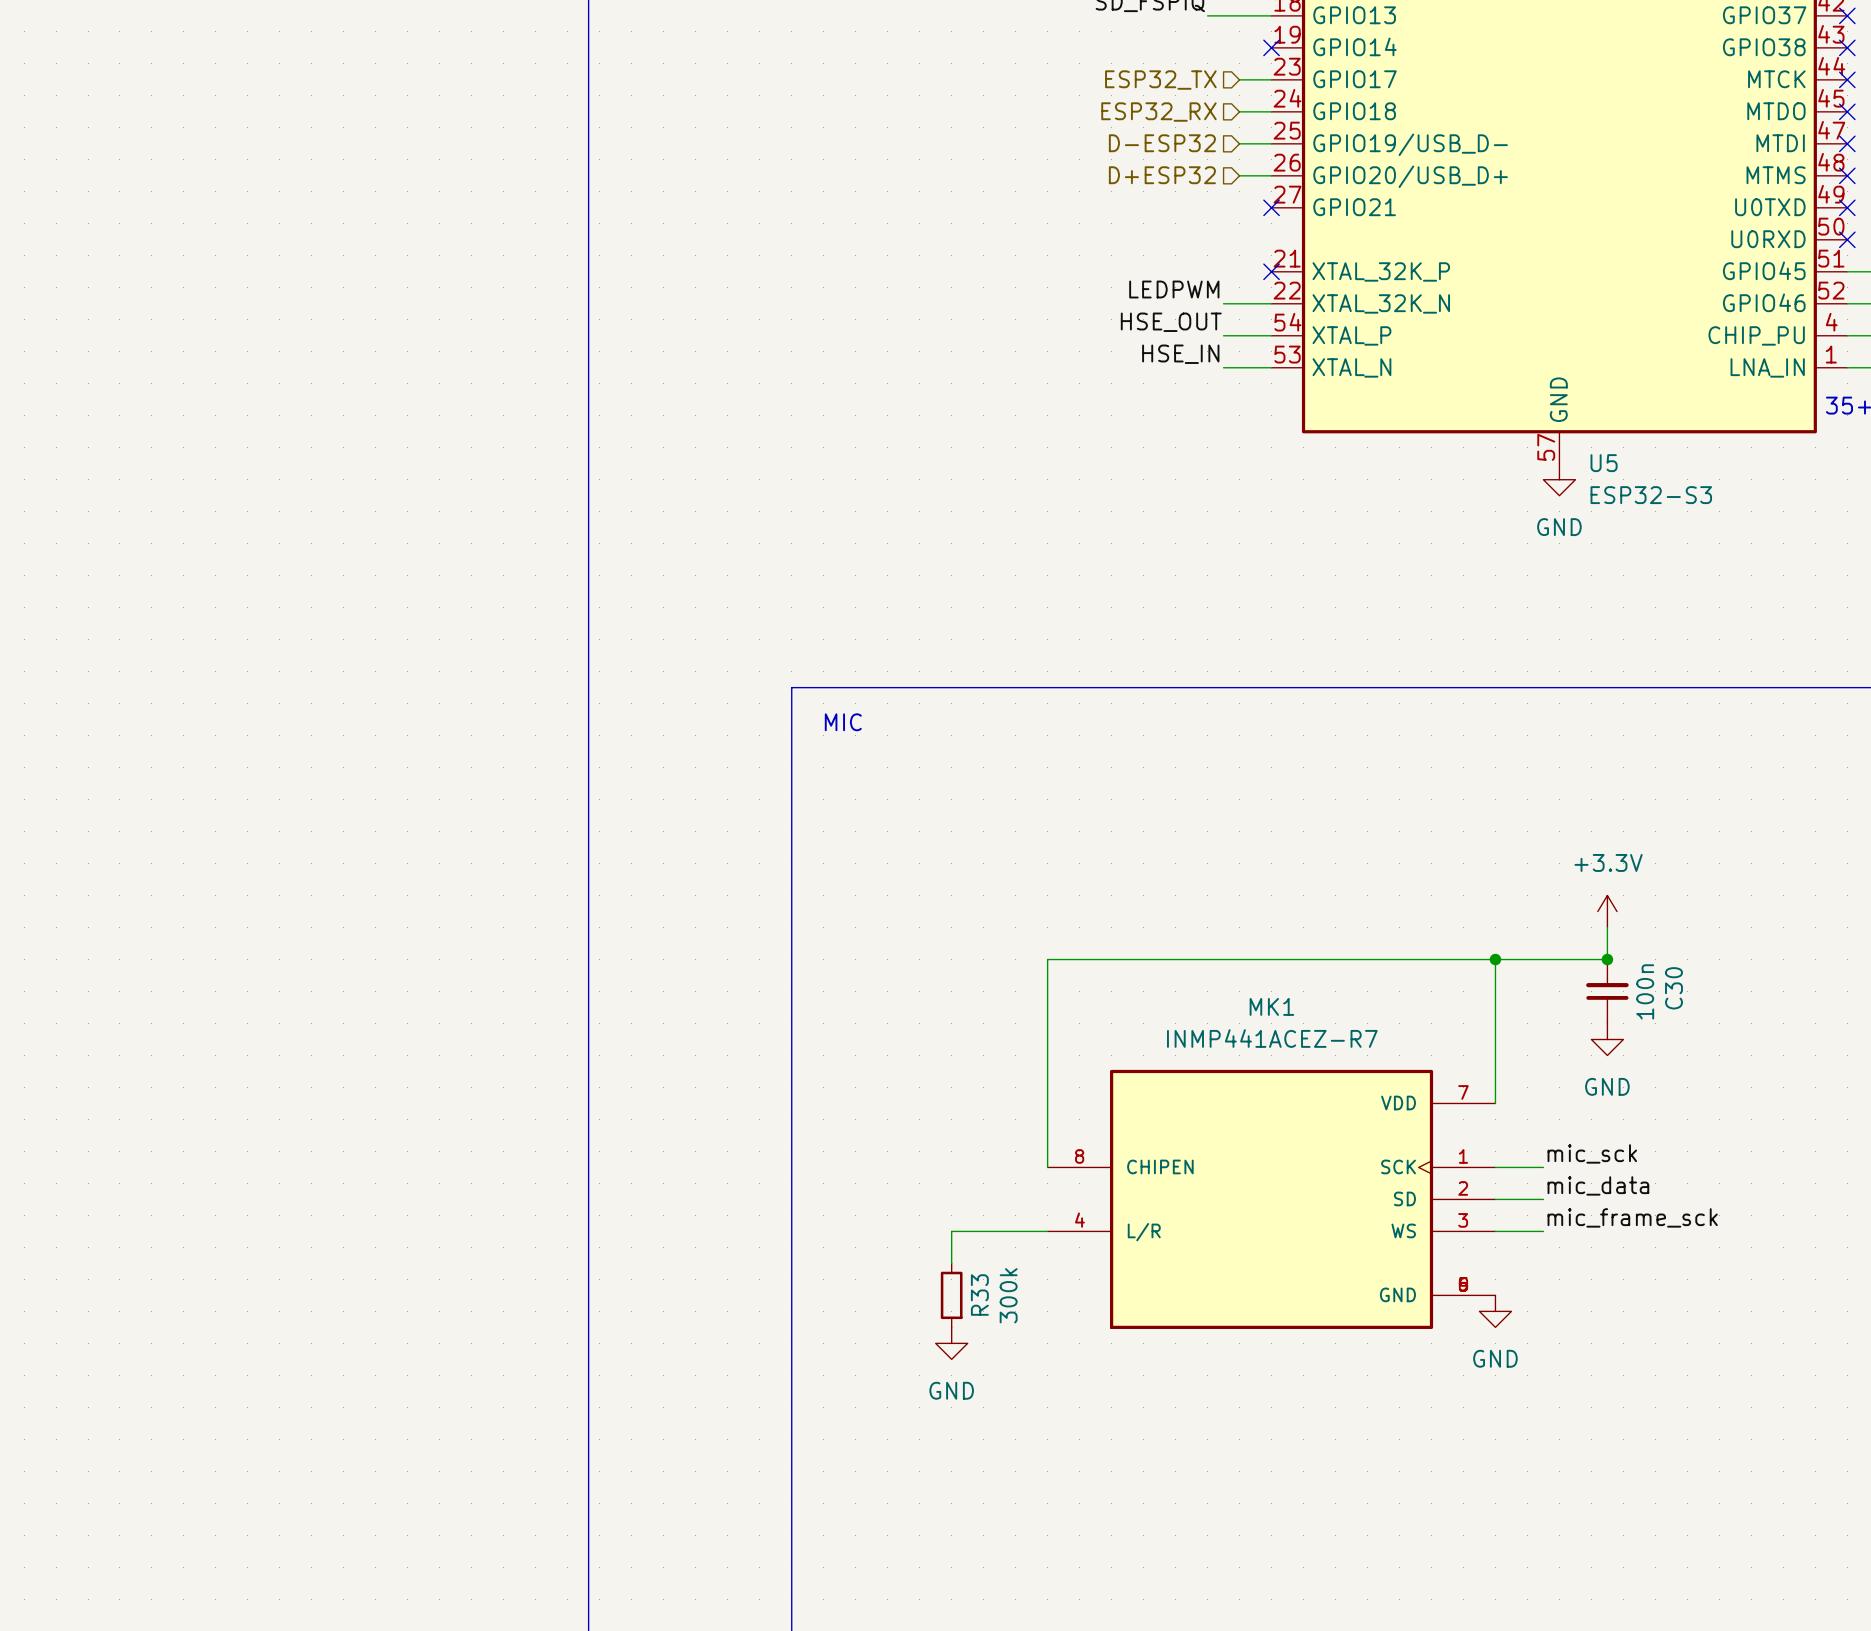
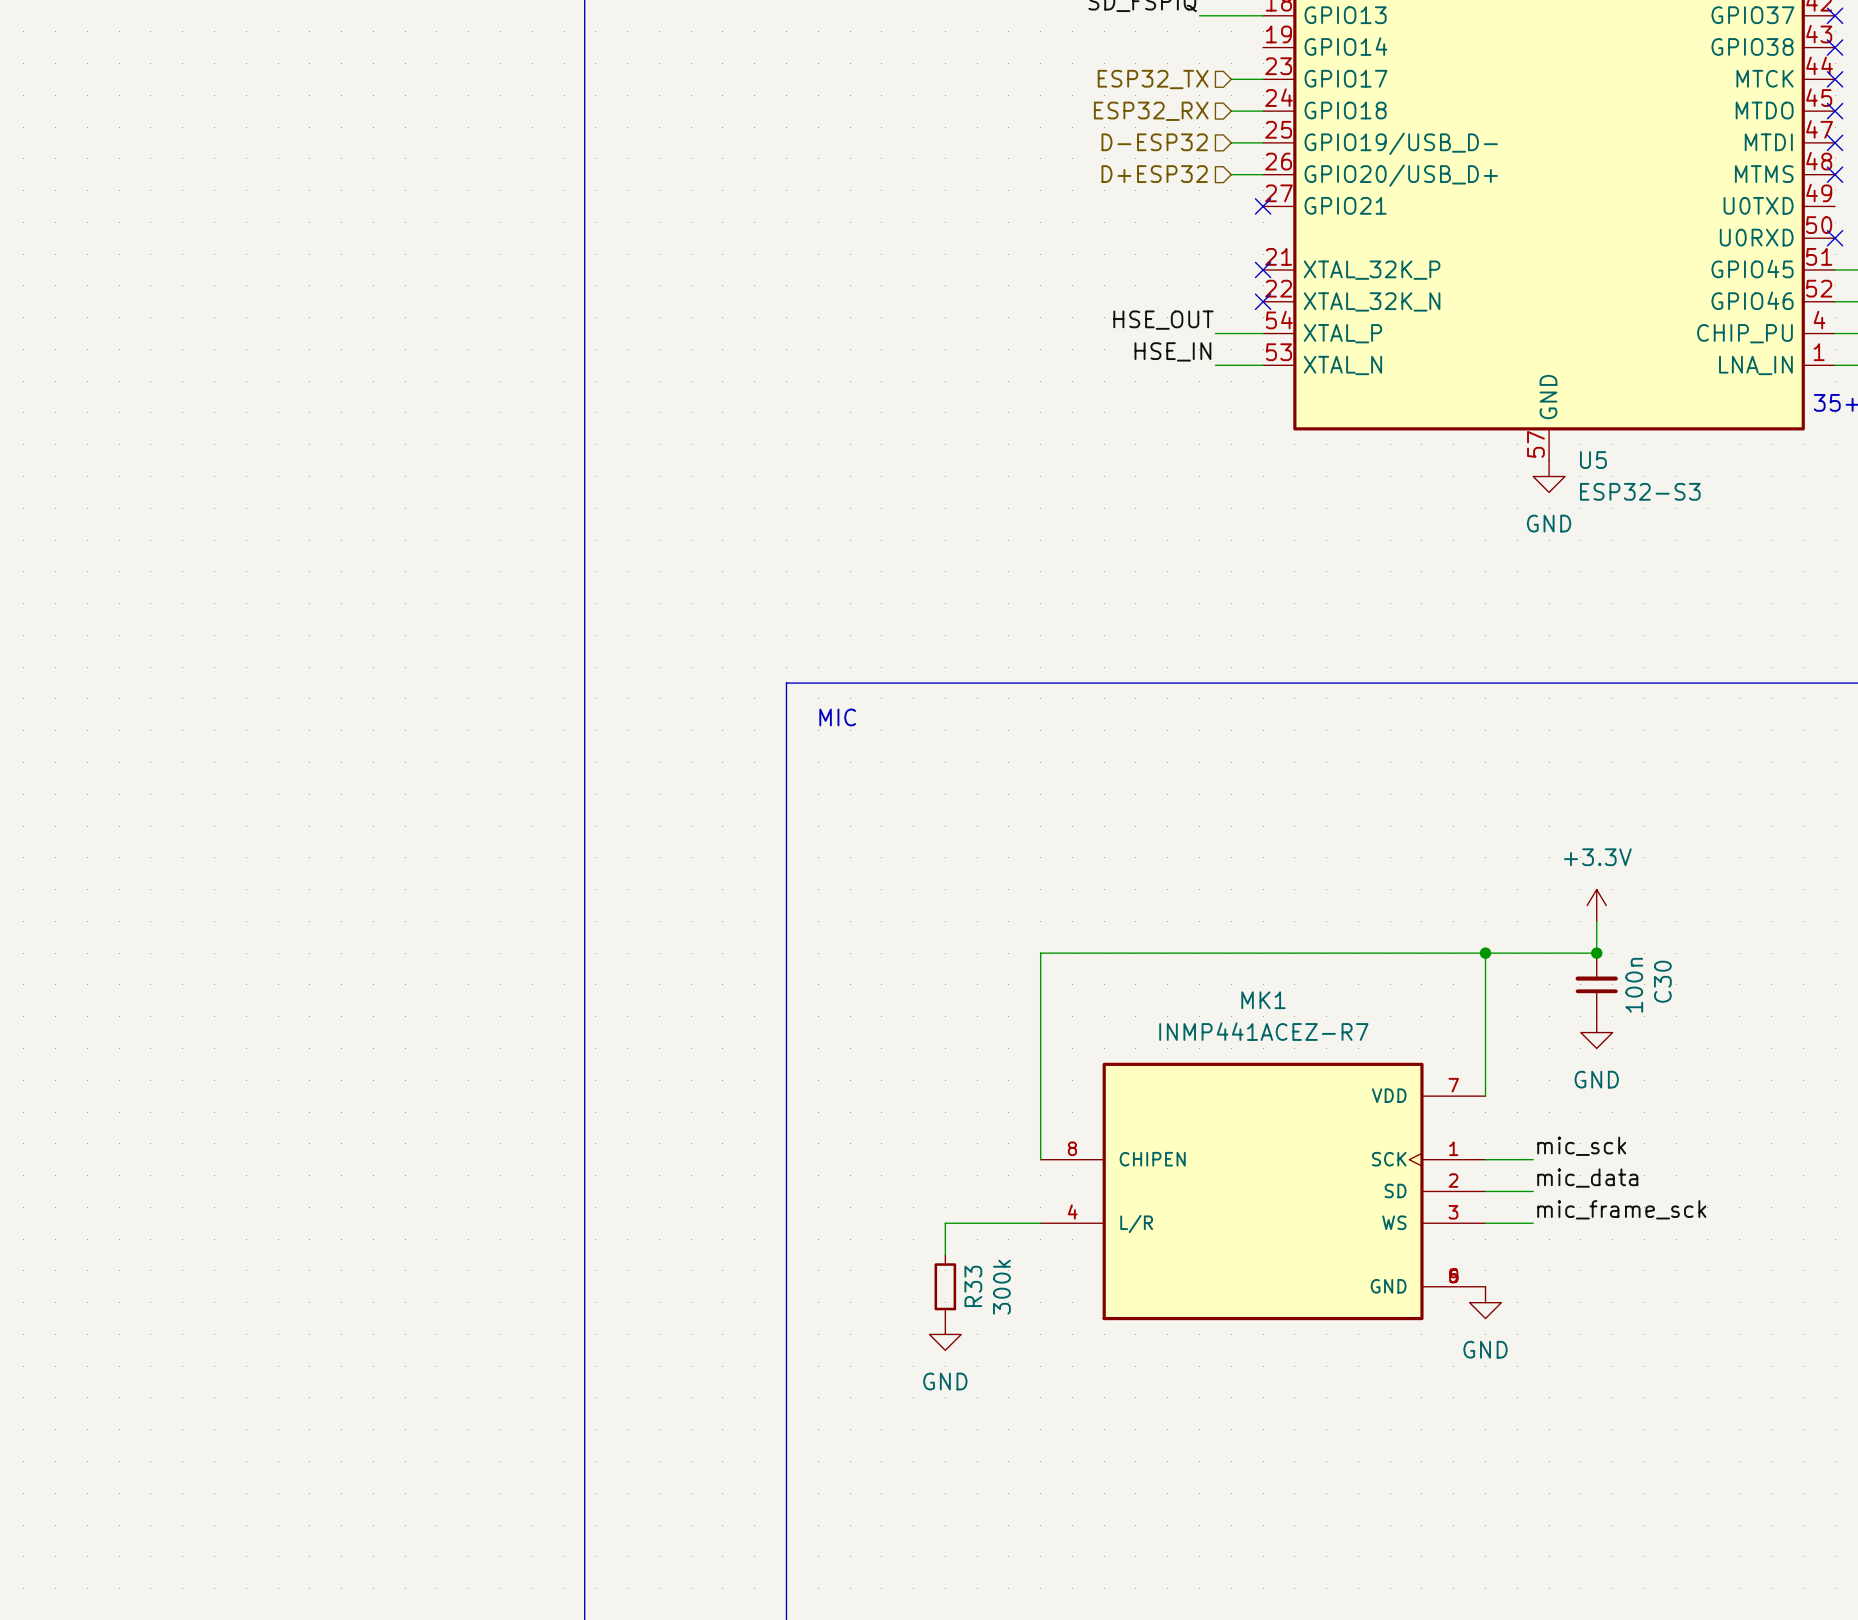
no-connect mark: (1271, 47) -> none
no-connect mark: (1847, 207) -> none
label: LEDPWM (1174, 289) -> none
wire: (1223, 303) (1271, 303) -> none
no-connect mark: none -> (1263, 301)

